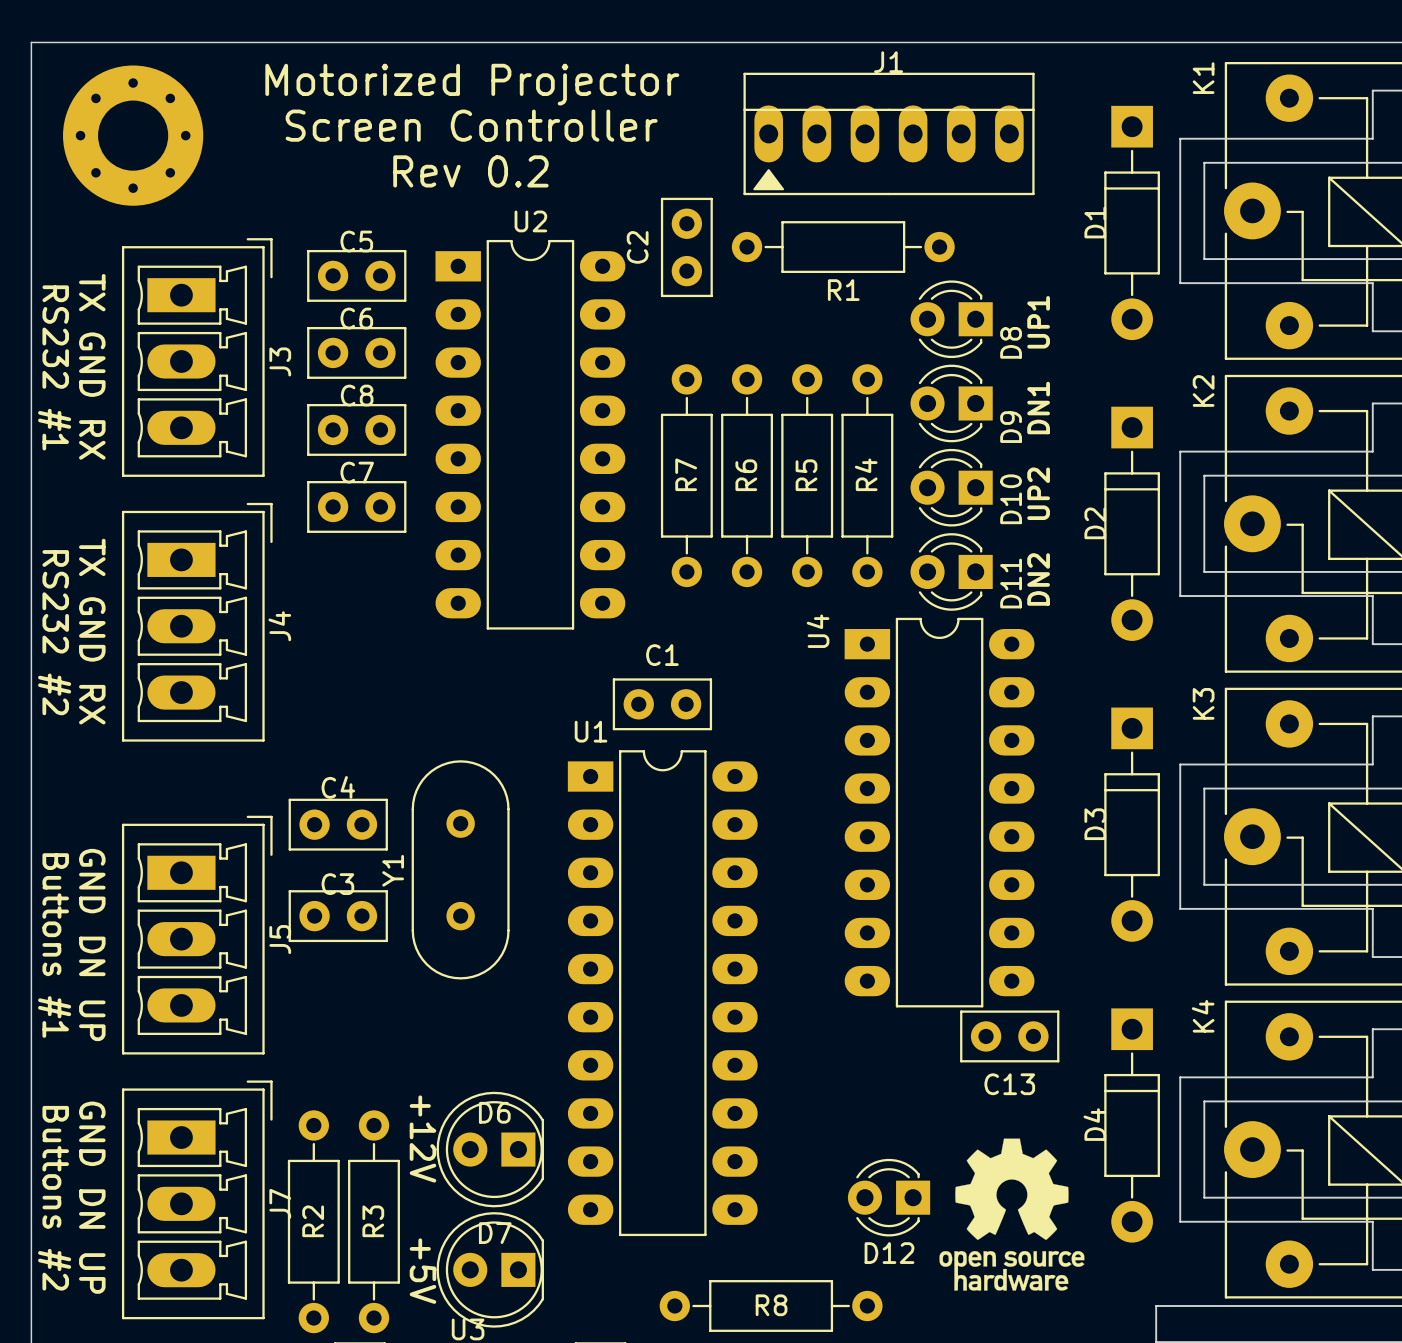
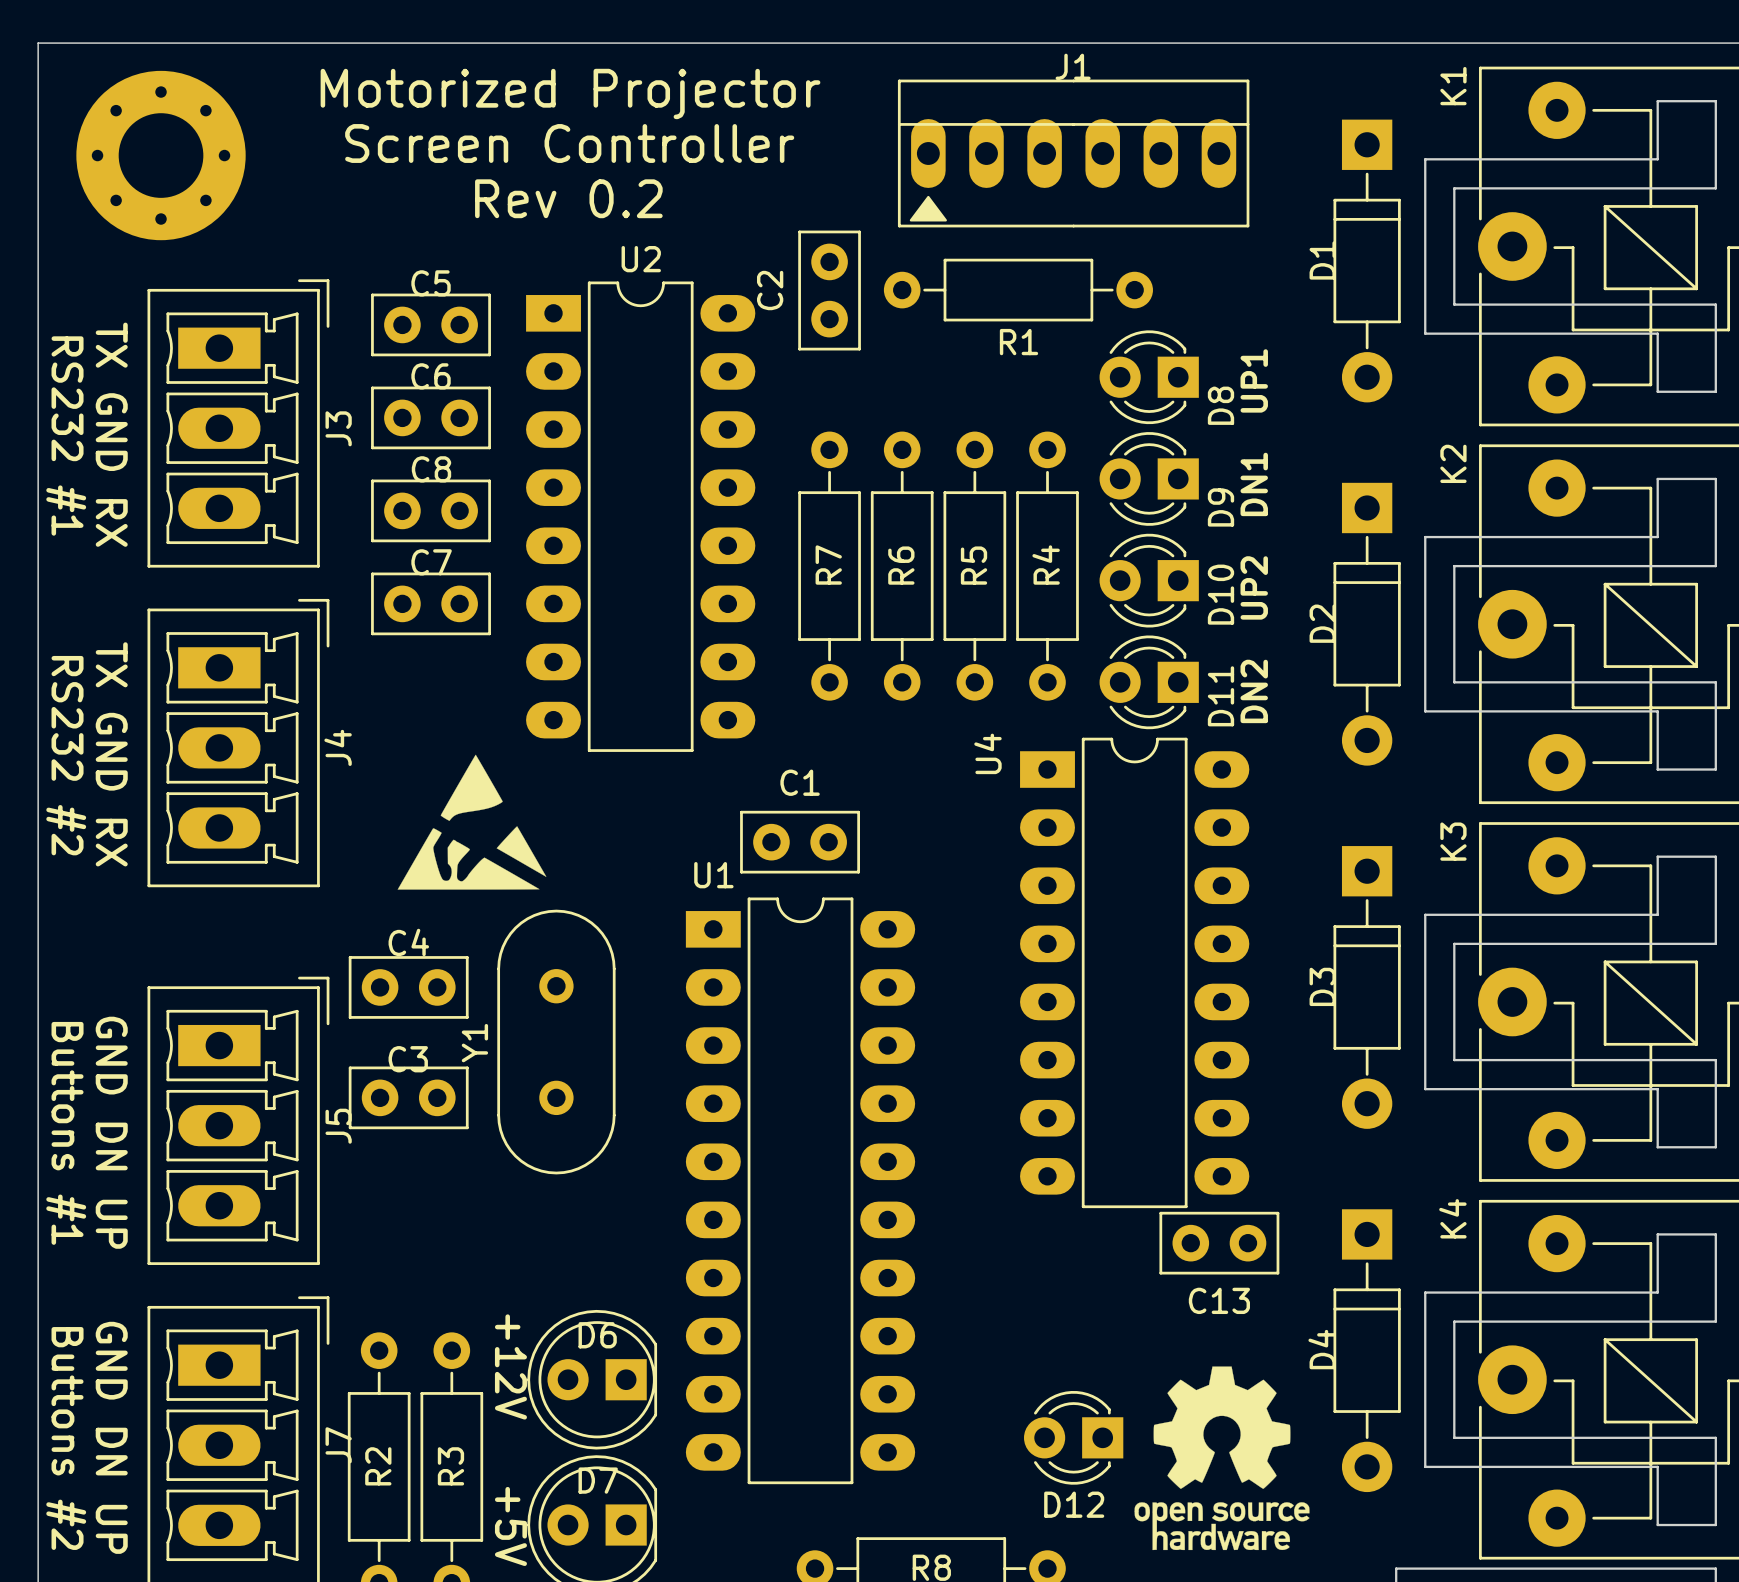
drawing: none -> [397, 754, 547, 890]

